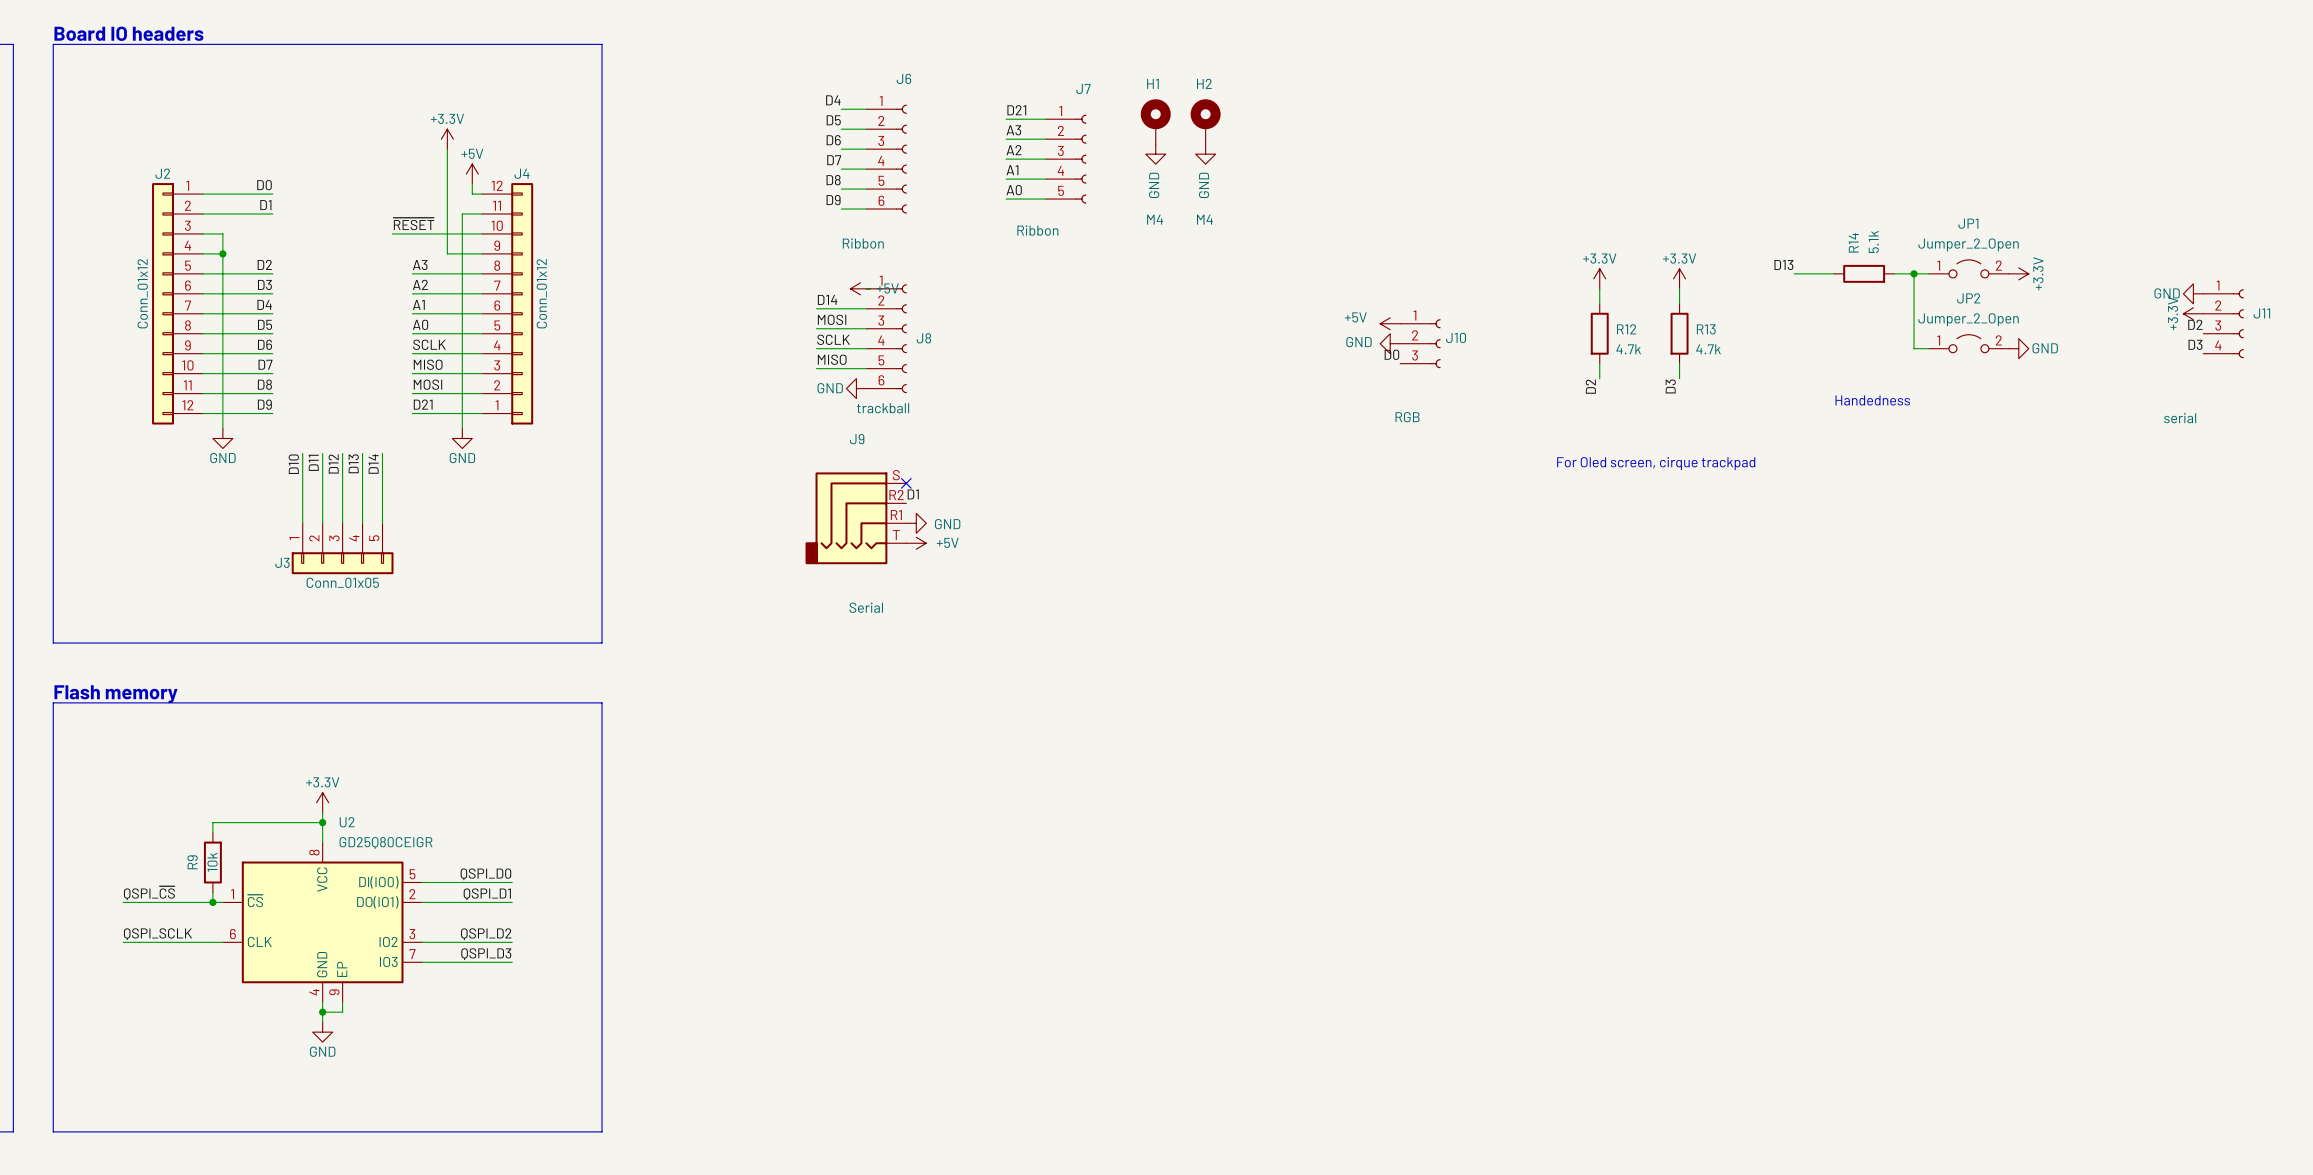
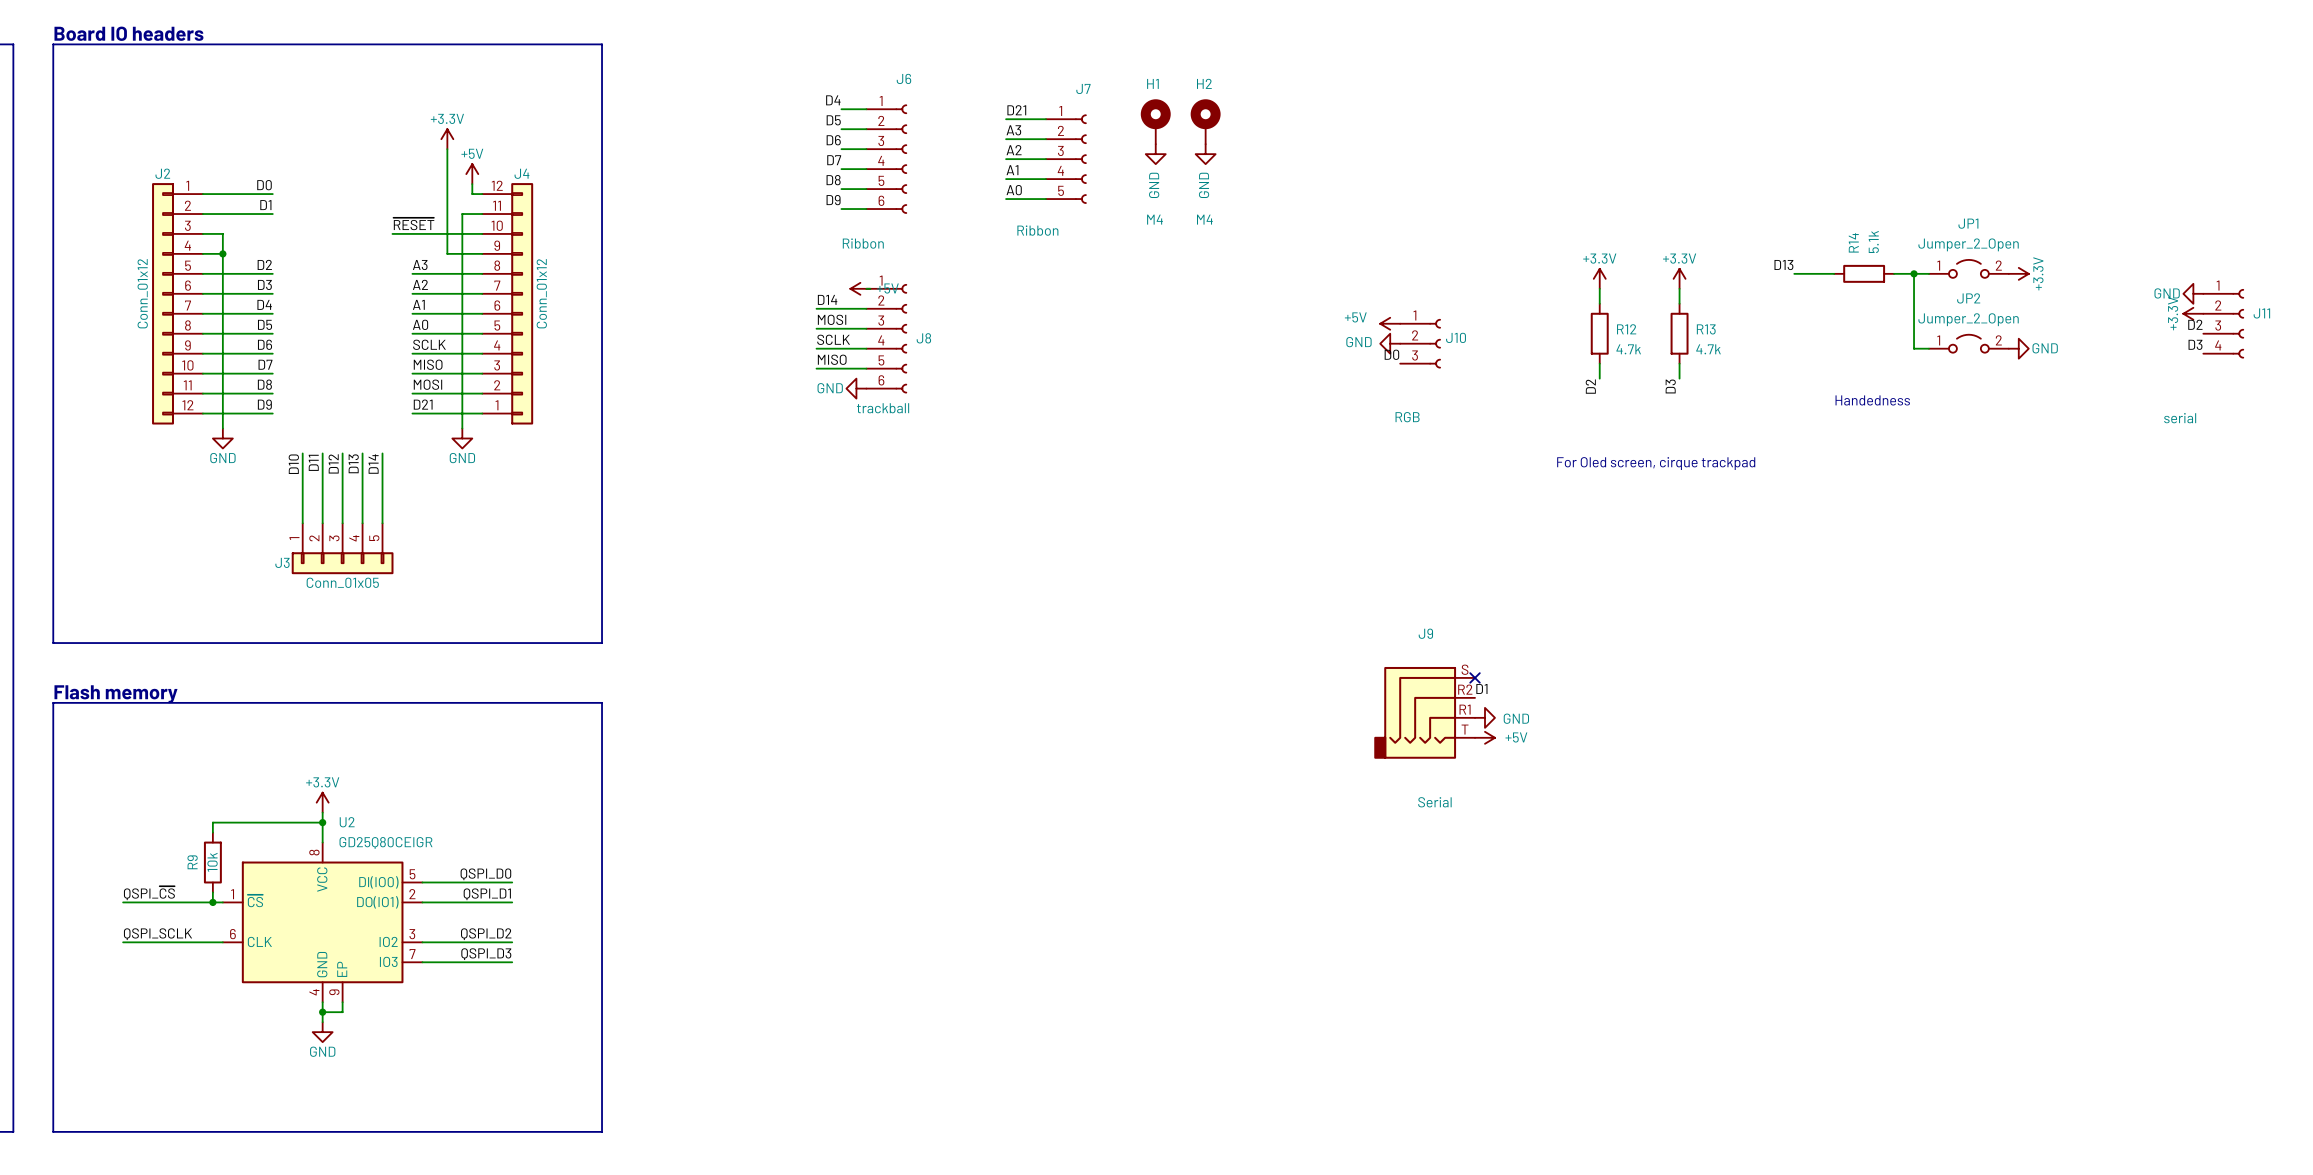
no-connect mark: (906, 483) -> none
label: D1 (913, 494) -> none
J9 position: (855, 518) -> (1424, 712)
power symbol: GND (916, 523) -> none
power symbol: +5V (916, 543) -> none
no-connect mark: none -> (1475, 677)
label: none -> D1 (1481, 688)
power symbol: none -> GND (1485, 717)
power symbol: none -> +5V (1485, 737)

